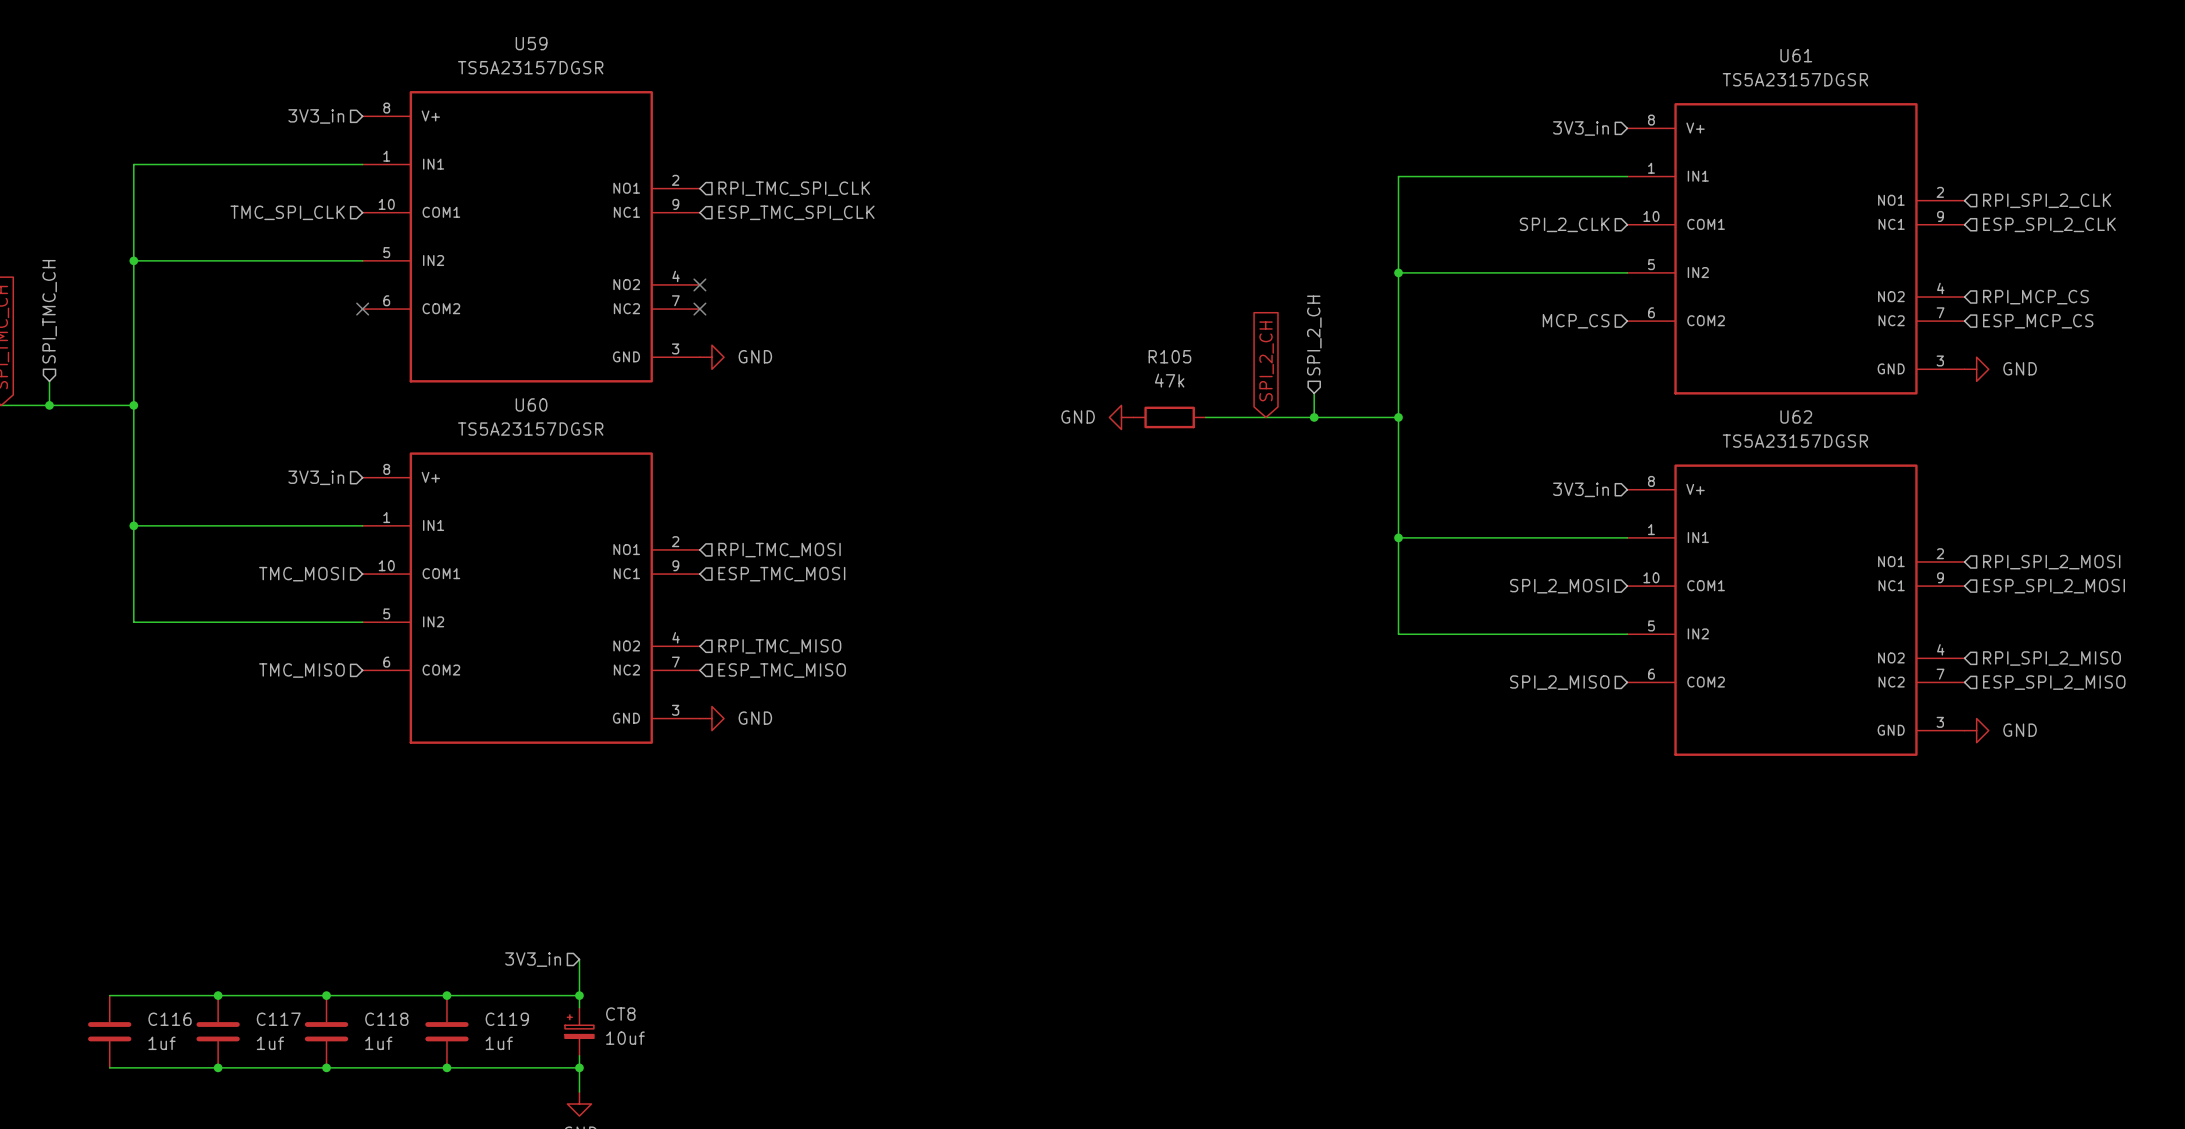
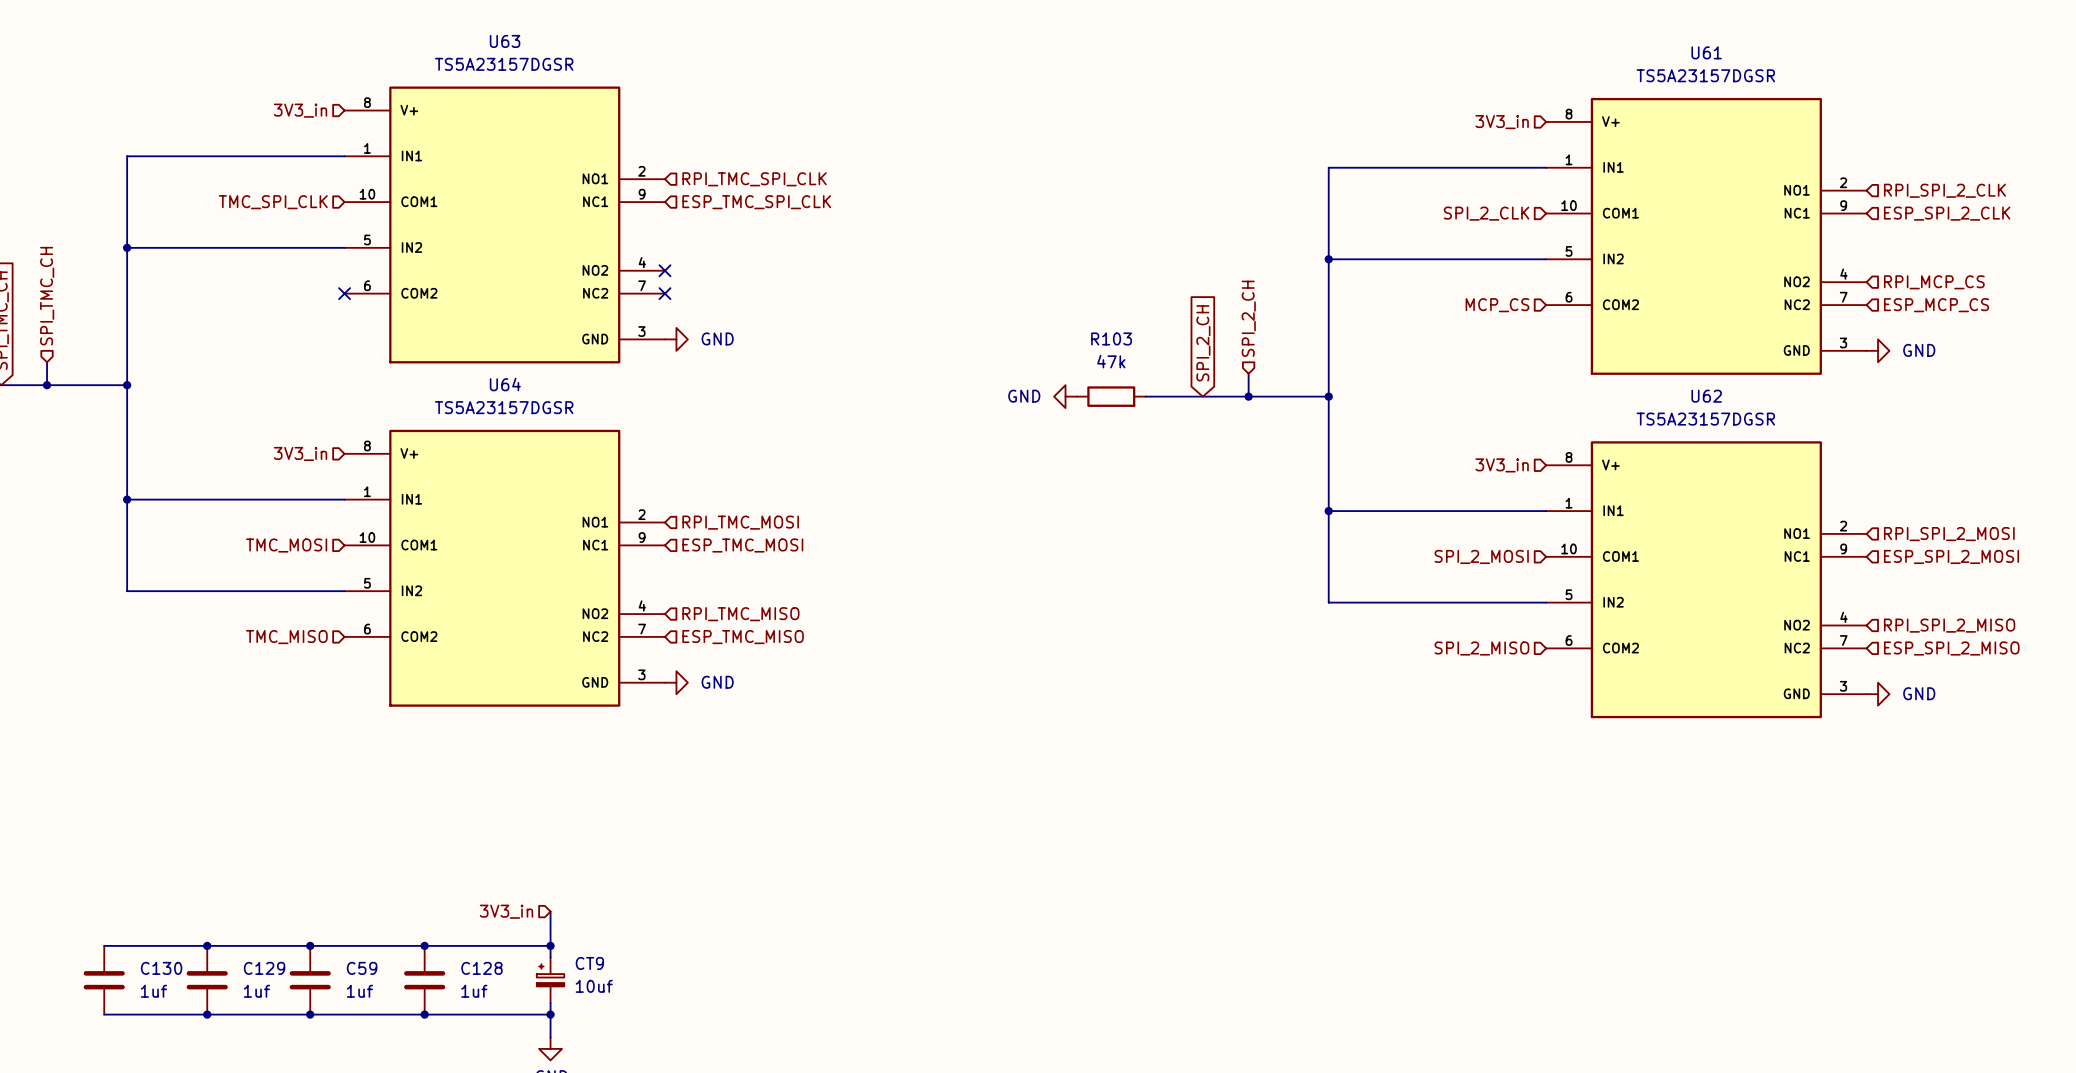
U59 name: U59 (531, 43) -> U63 (505, 41)
R105 name: R105 (1169, 356) -> R103 (1111, 338)
U60 name: U60 (531, 404) -> U64 (505, 384)
CT8 name: CT8 (620, 1014) -> CT9 (589, 963)
C116 name: C116 (170, 1019) -> C130 (161, 968)
C117 name: C117 (278, 1019) -> C129 (264, 968)
C118 name: C118 (386, 1019) -> C59 (362, 968)
C119 name: C119 (507, 1019) -> C128 (481, 968)

